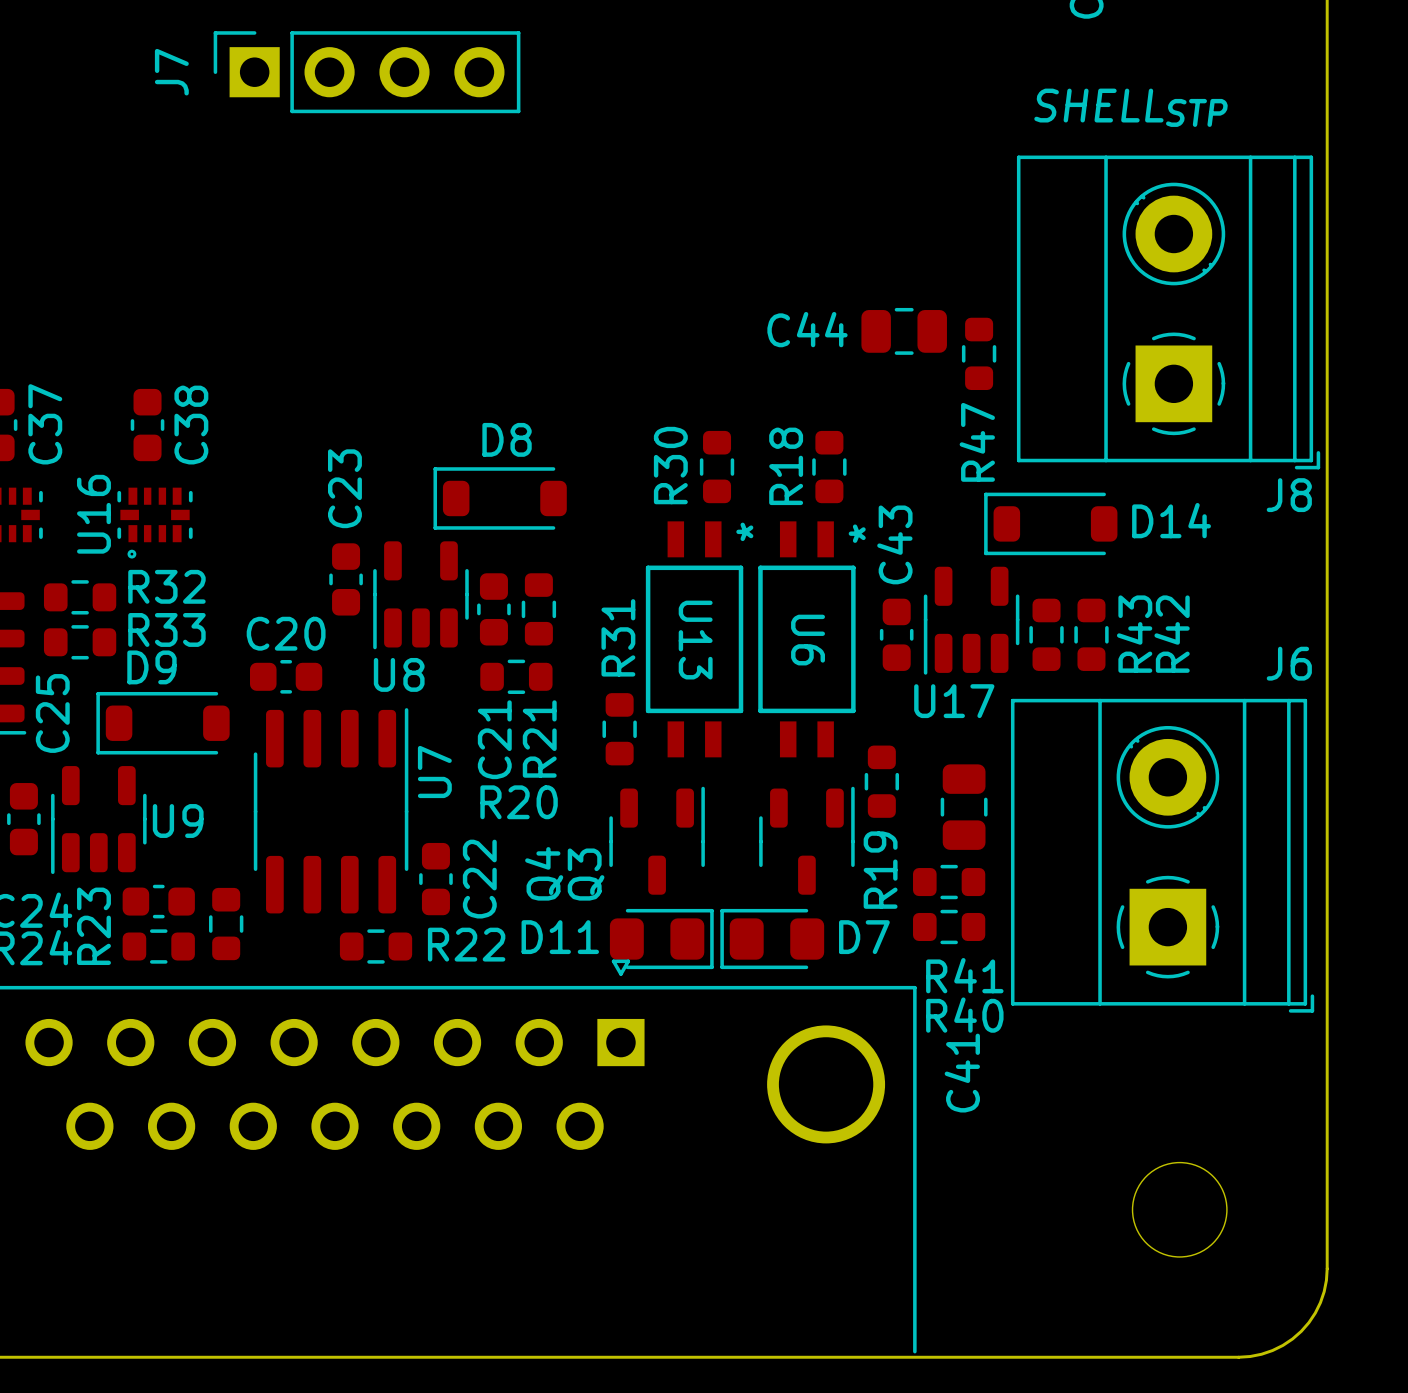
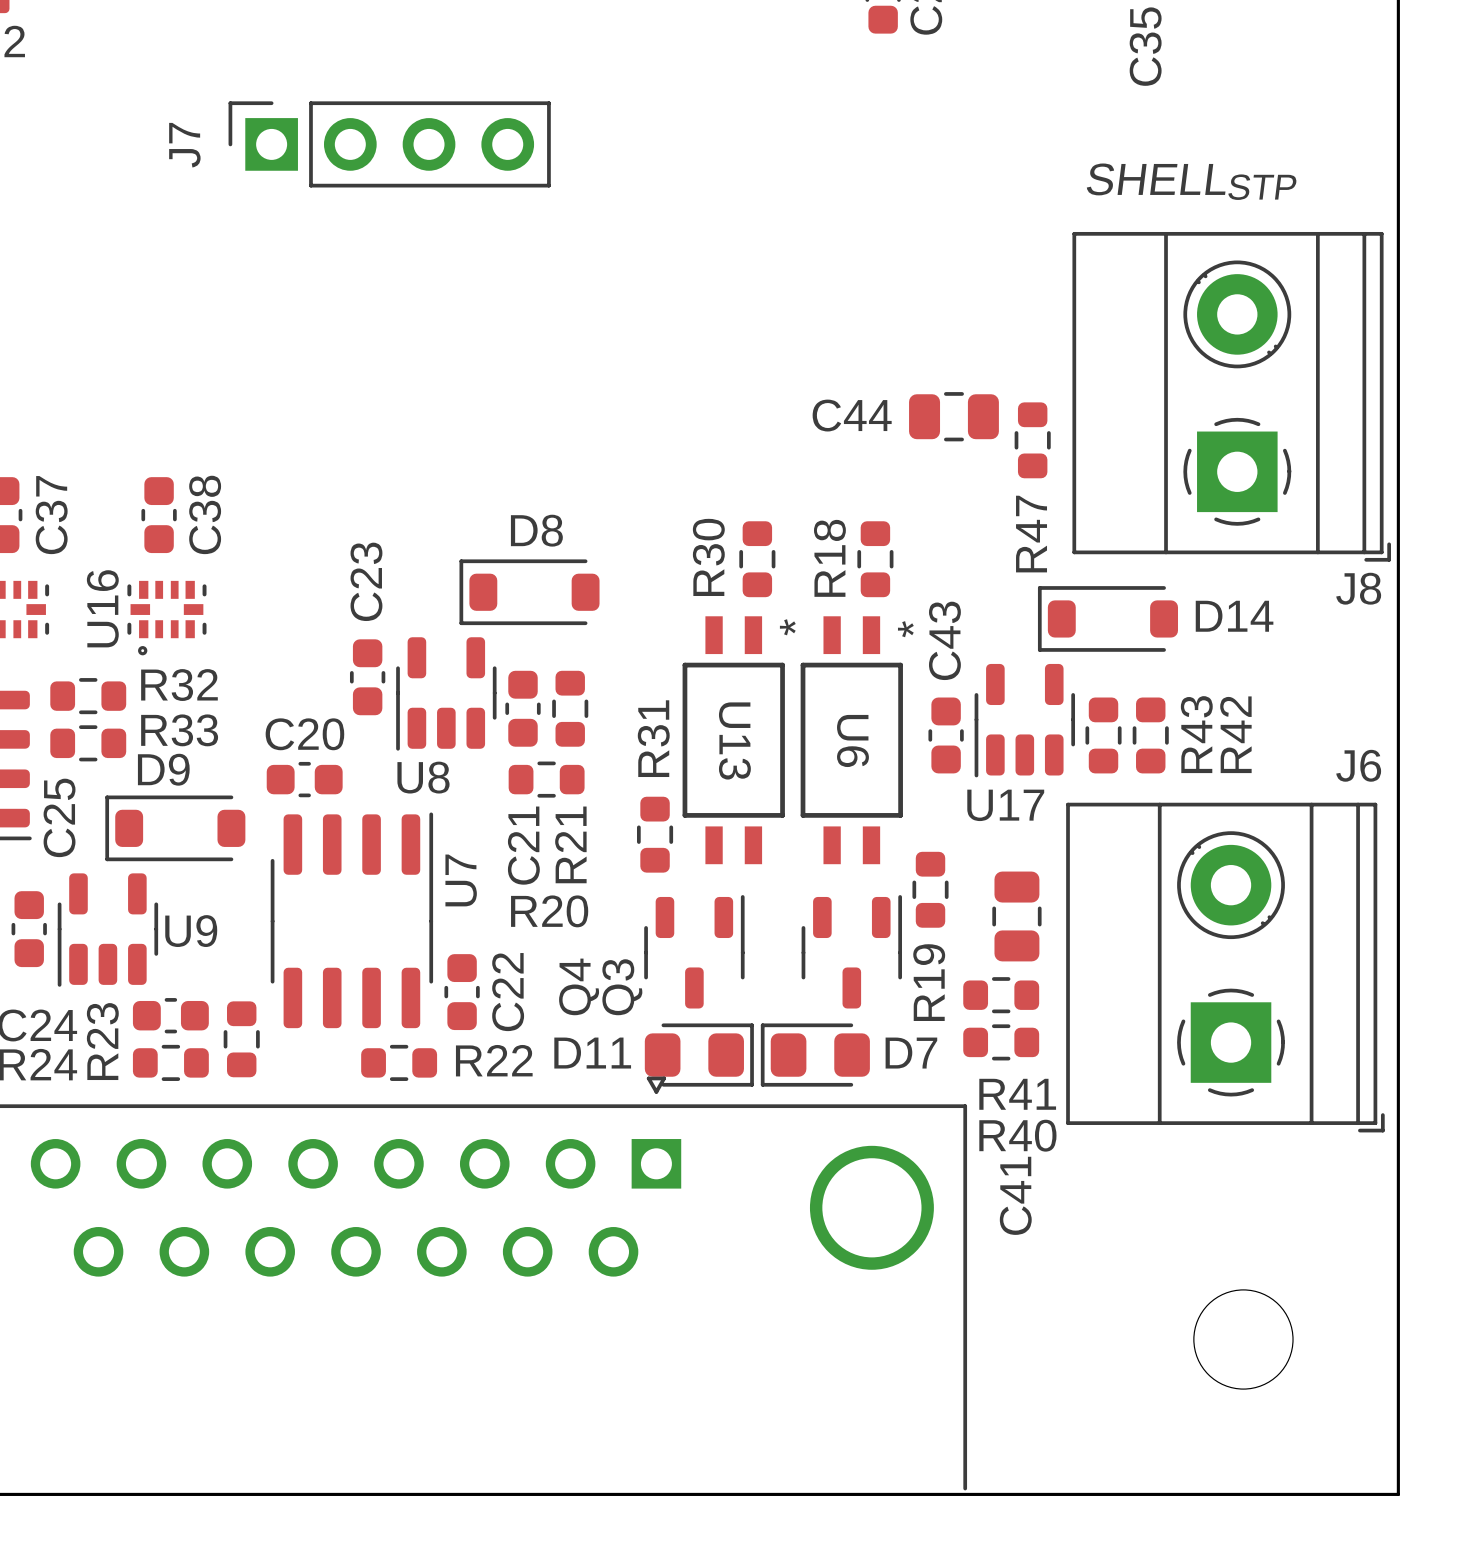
board edge: (1327, 1268) (1326, 1280) (1320, 1302) (1315, 1313) (1301, 1331) (1292, 1338) (1272, 1350) (1250, 1356) (1238, 1357) -> (1398, 1401) (1398, 1494) (1305, 1494)

